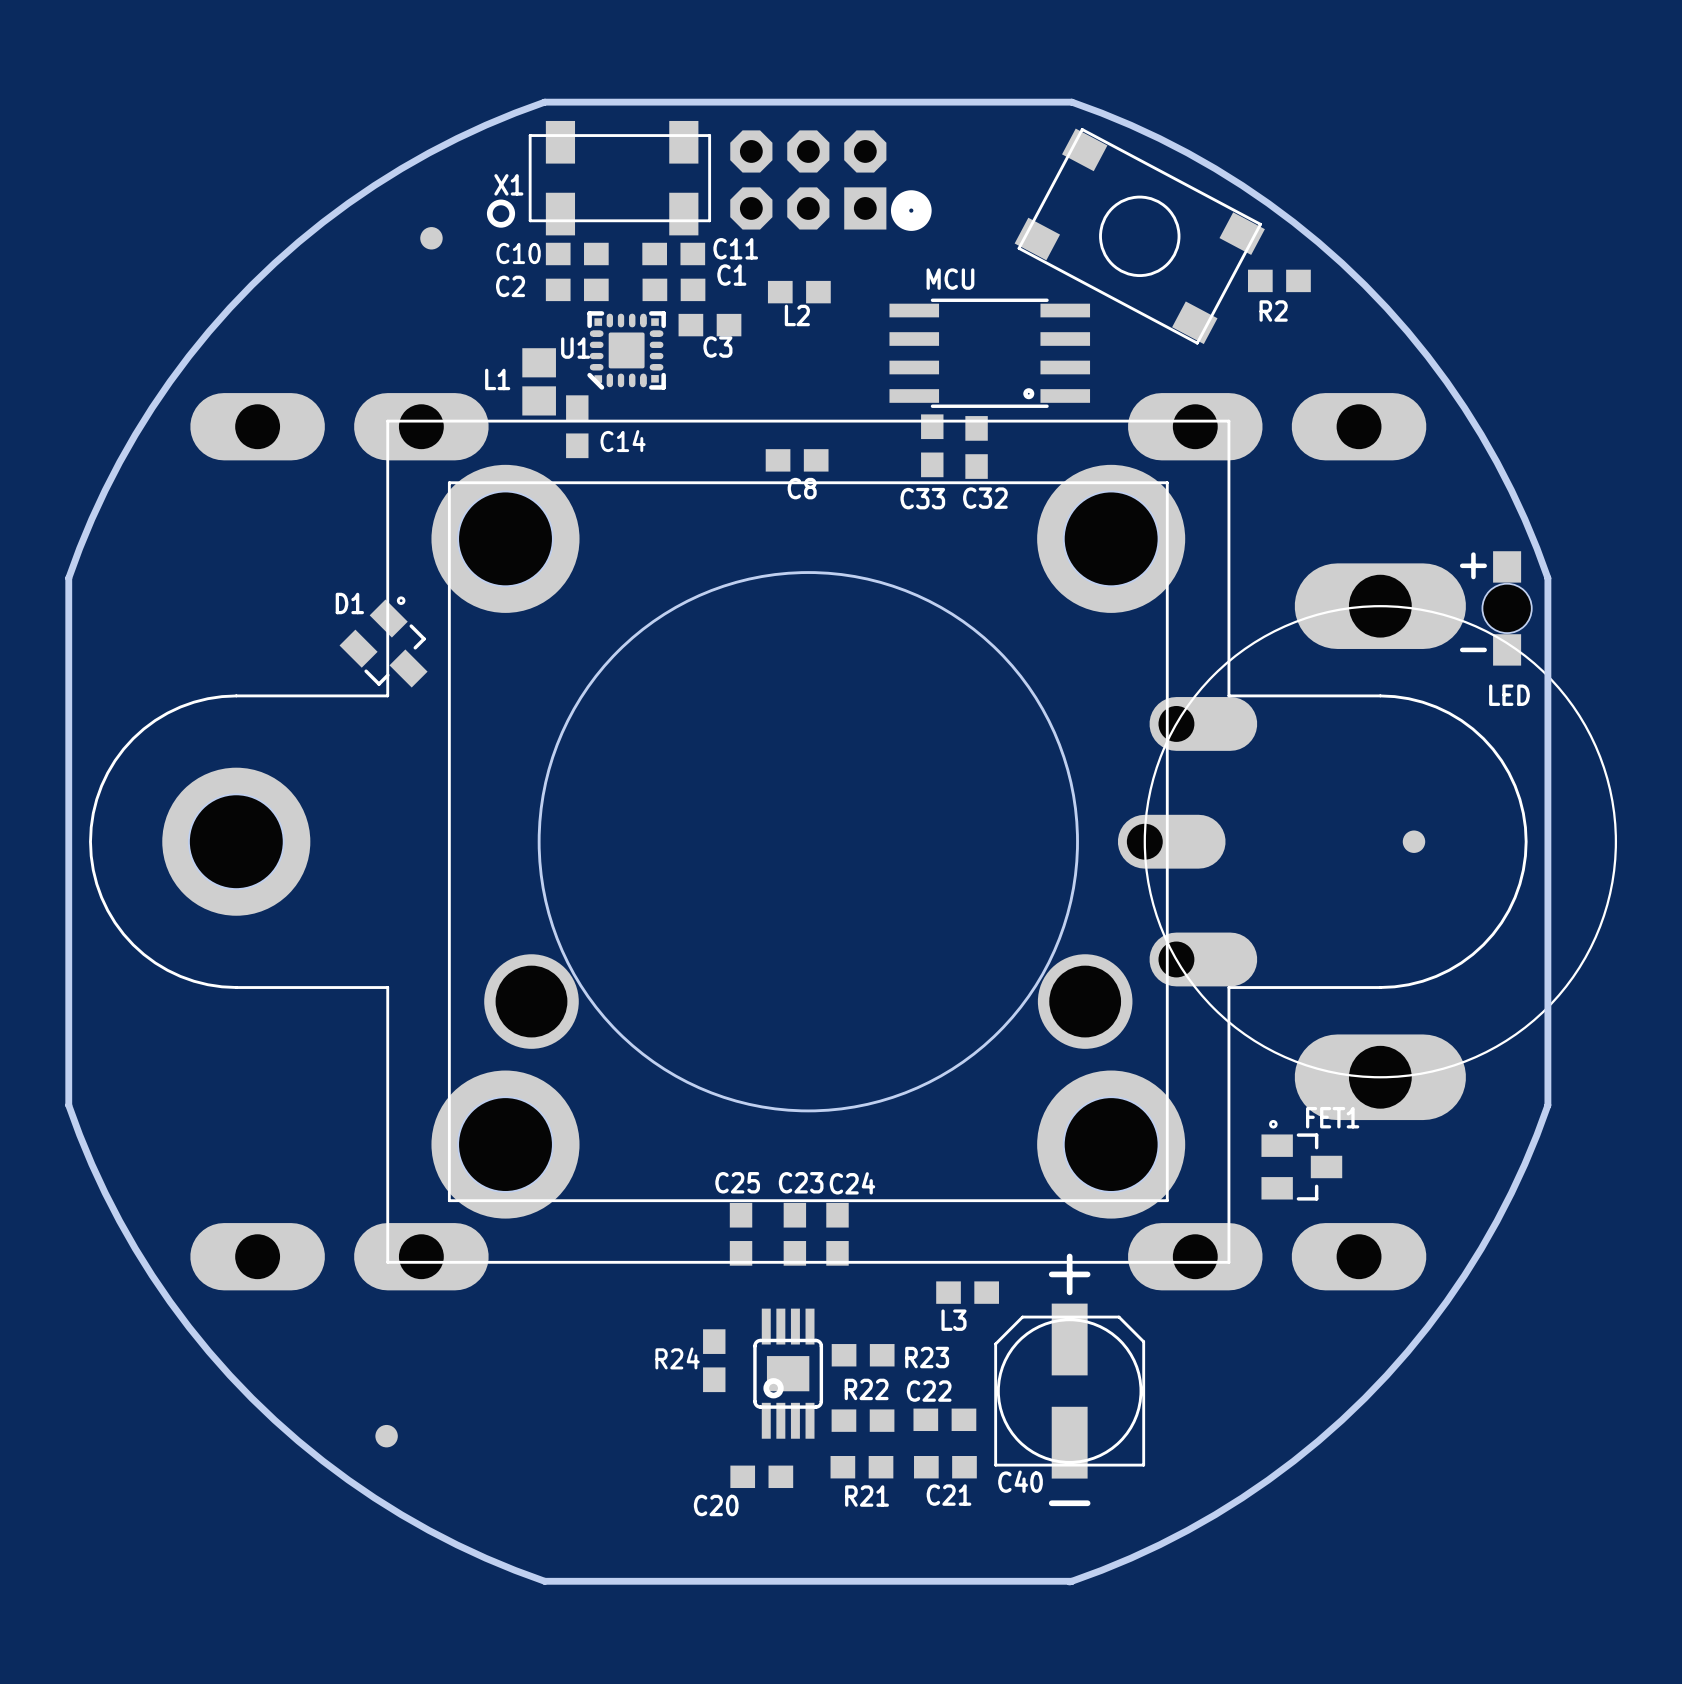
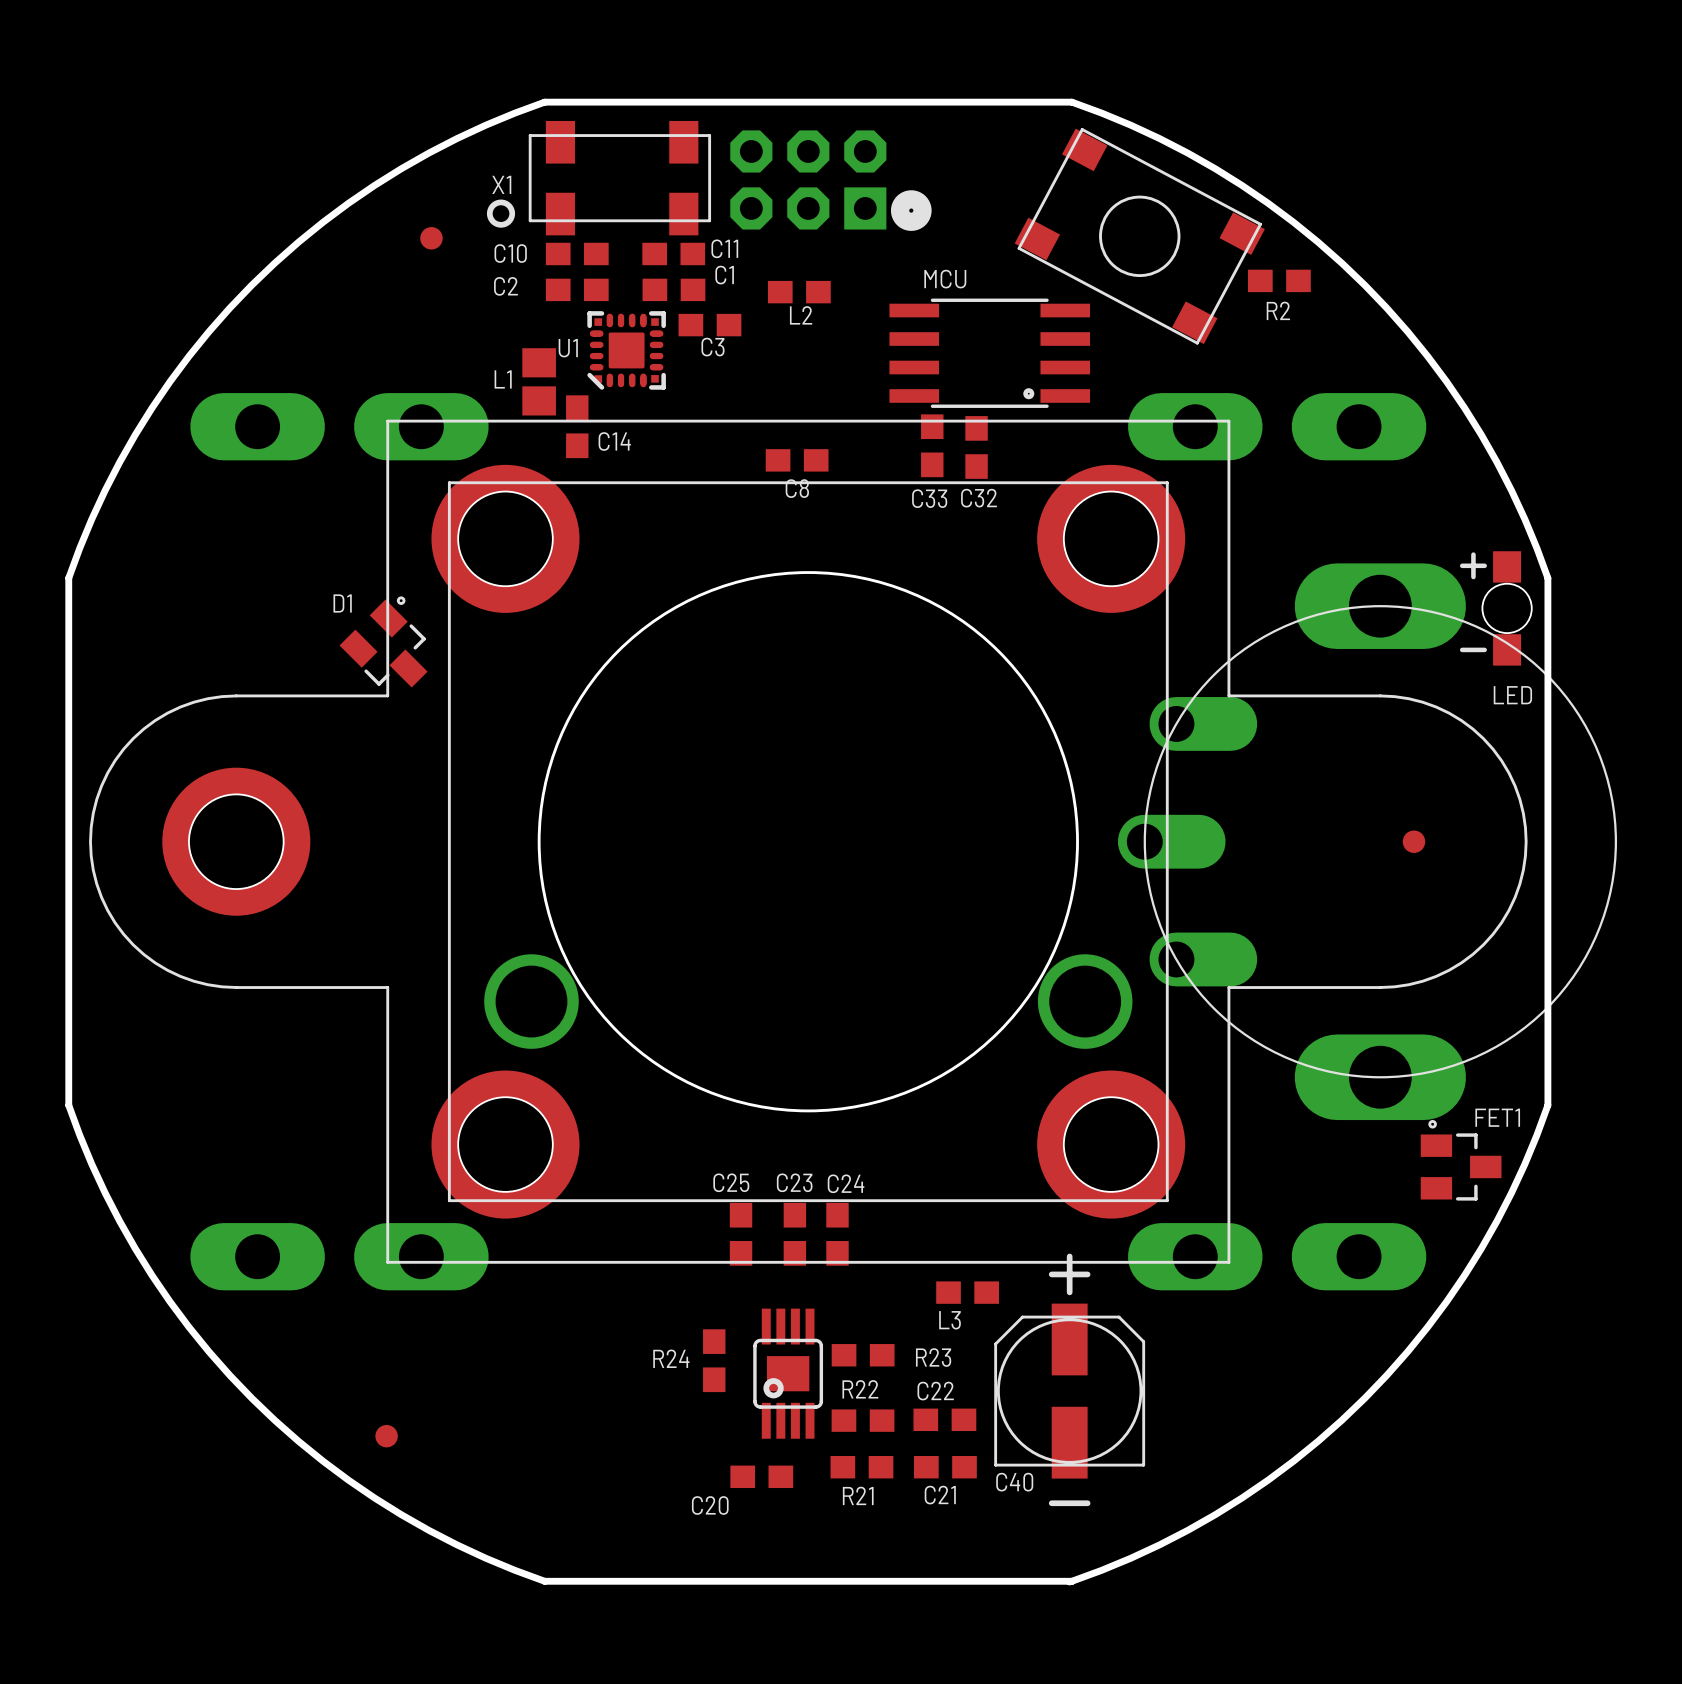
FET1 position: (1301, 1160) -> (1461, 1160)

